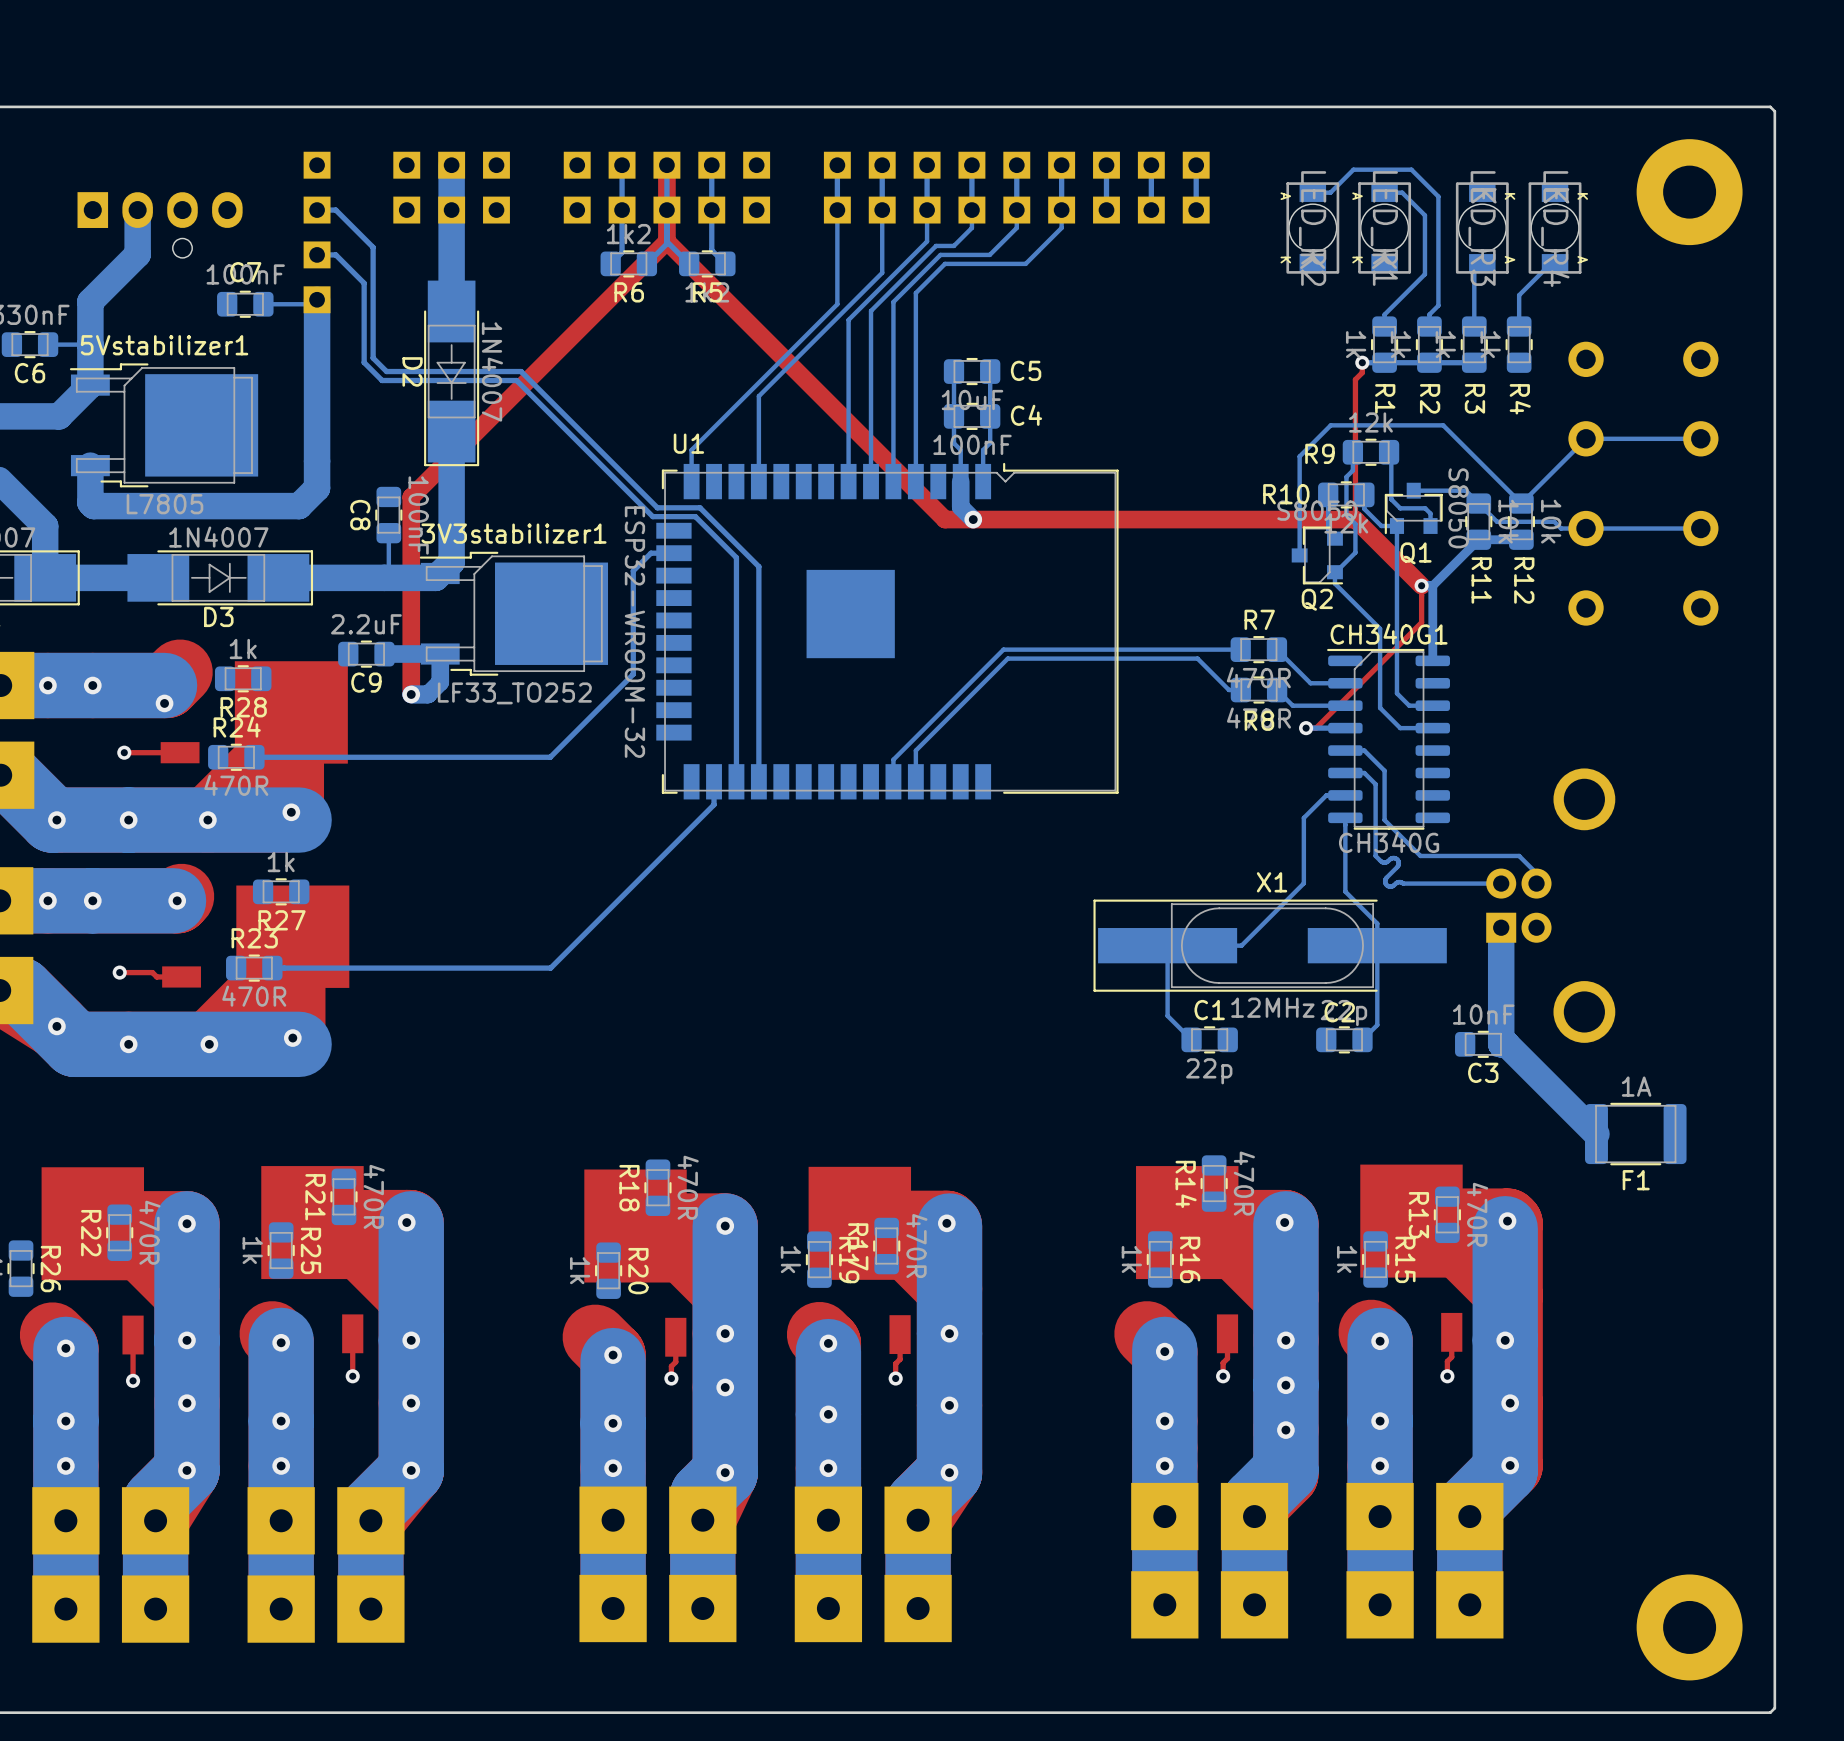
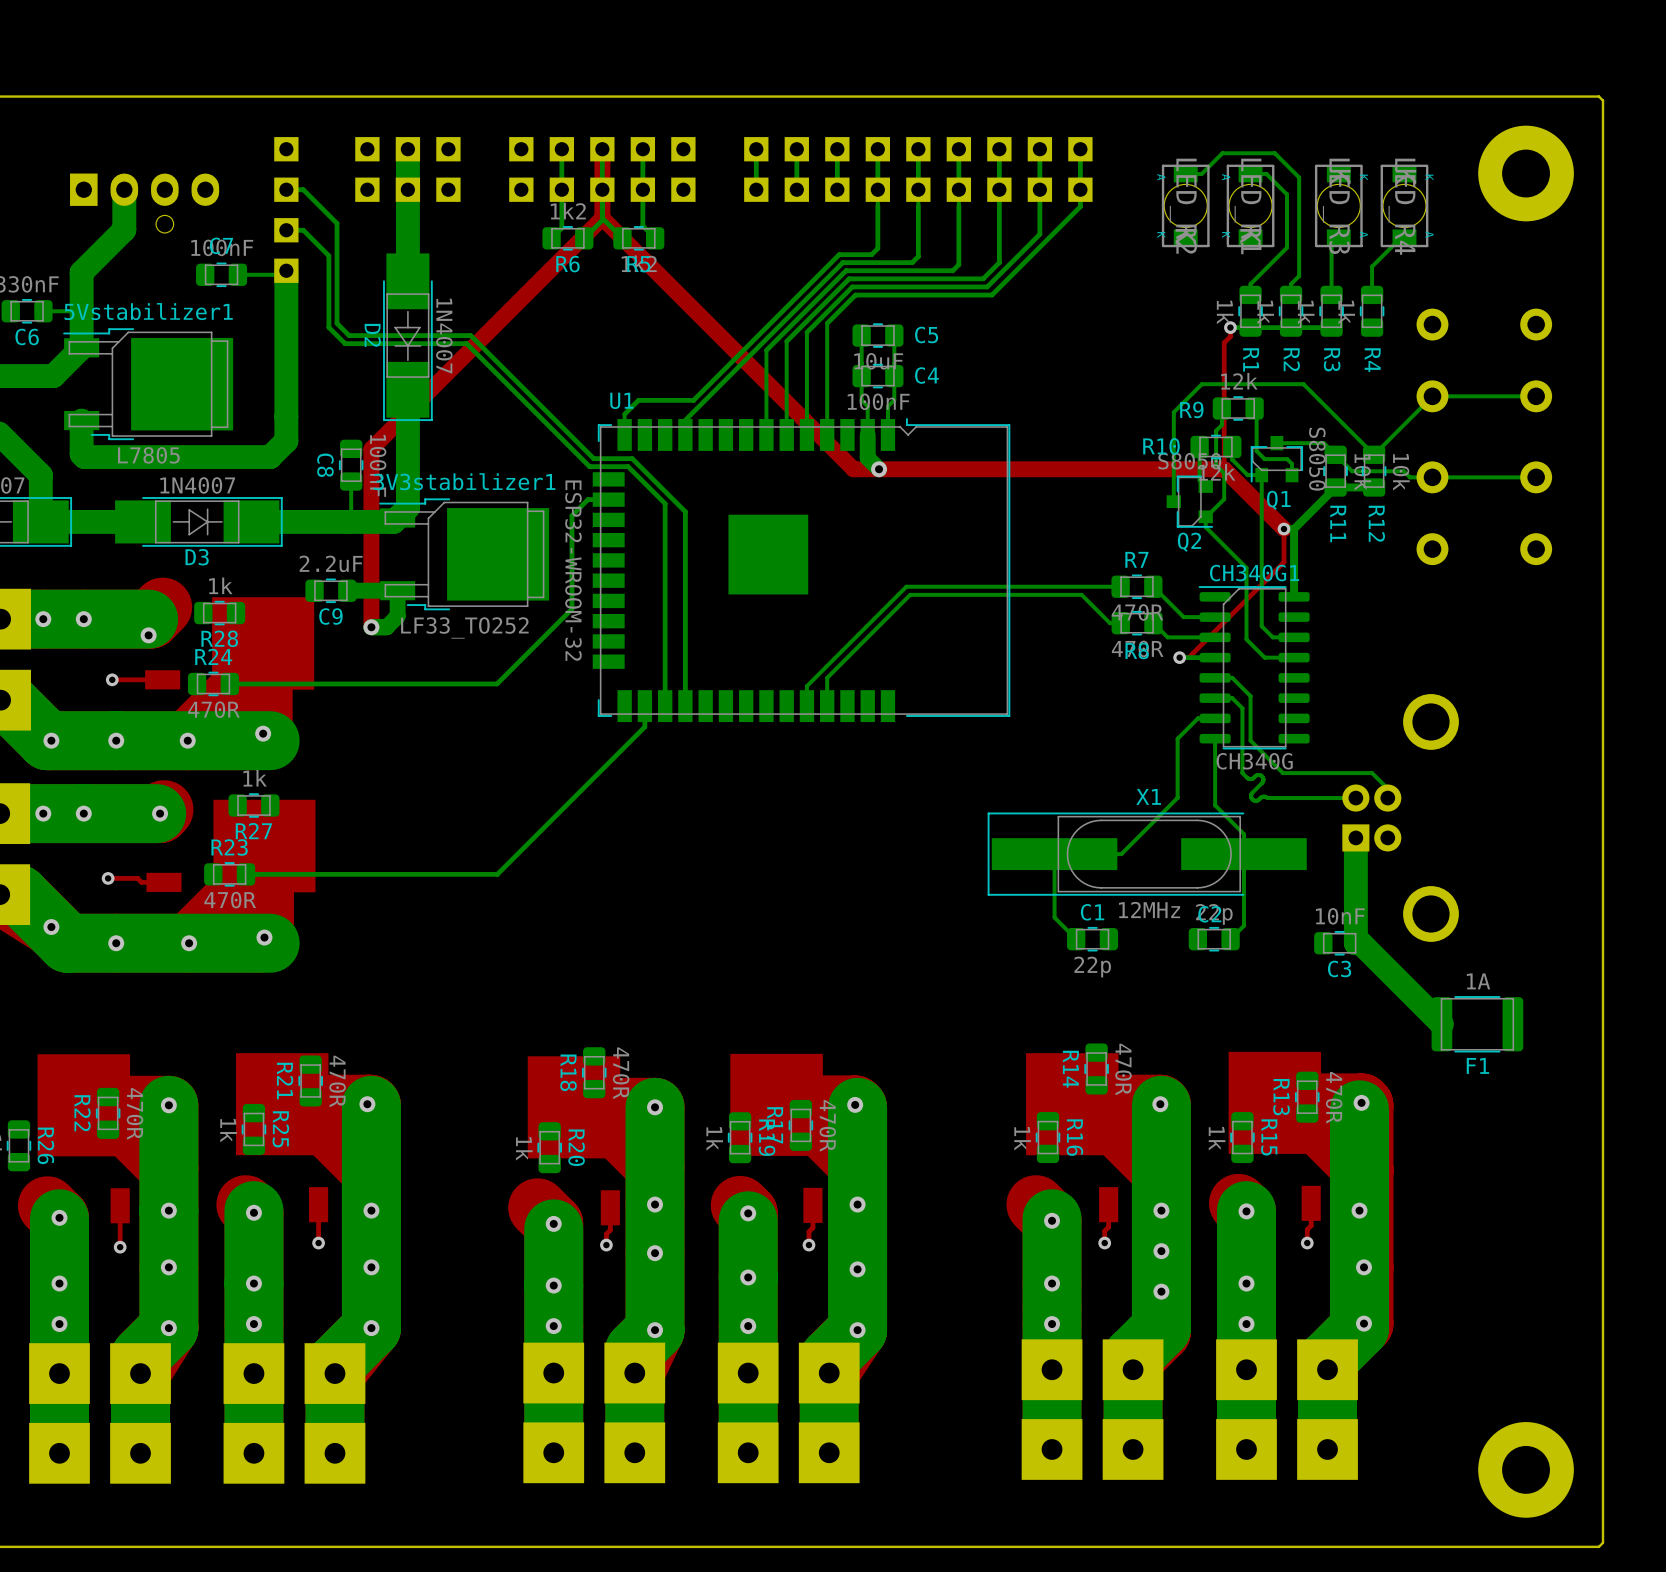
bottom track: (837, 210) (837, 304) (691, 450) (691, 458) -> (877, 205) (877, 248) (871, 254) (839, 254) (693, 400) (638, 400) (624, 414)
bottom track: (882, 210) (882, 272) (758, 396) (758, 465) -> (918, 205) (918, 256) (912, 262) (842, 262) (685, 420)
bottom track: (927, 210) (927, 241) (848, 319) (848, 387) -> none
bottom track: none -> (1080, 189) (1080, 206) (992, 295) (855, 295) (827, 323)
bottom track: (971, 227) (953, 245) (936, 245) (871, 310) (871, 377) -> (999, 189) (999, 262) (983, 278) (849, 278) (786, 341)
bottom track: (1016, 227) (989, 254) (940, 254) (893, 302) (893, 368) -> (1039, 189) (1039, 234) (987, 286) (852, 286) (806, 332)
bottom track: (1061, 227) (1025, 263) (945, 263) (915, 293) (915, 358) -> (958, 205) (958, 264) (952, 270) (846, 270) (766, 350)

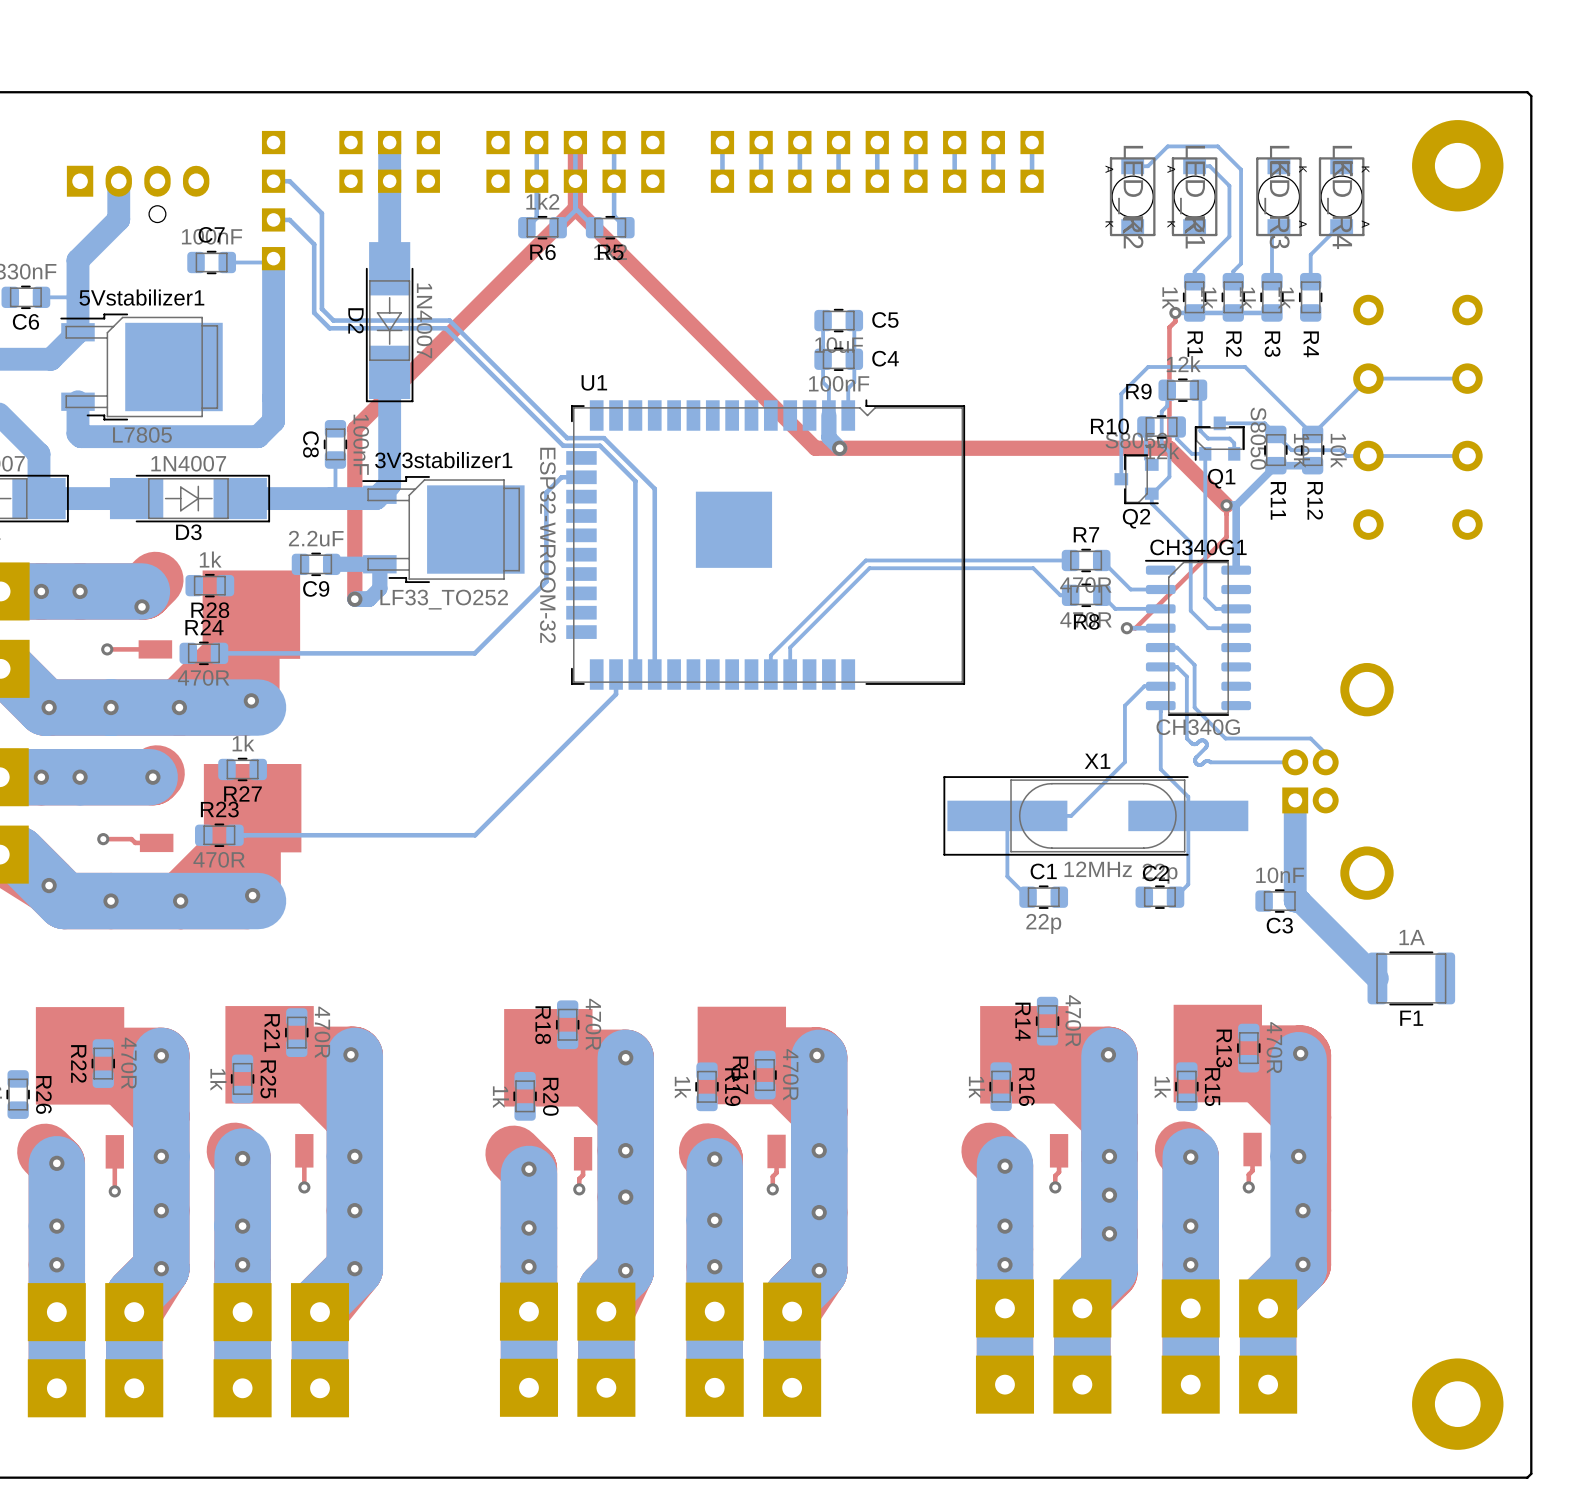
bottom track: (877, 189) (877, 248) (871, 254) (839, 254) (693, 400) (638, 400) (624, 414) (624, 434) -> none
bottom track: (918, 189) (918, 256) (912, 262) (842, 262) (685, 420) (685, 434) -> none
bottom track: (958, 189) (958, 264) (952, 270) (846, 270) (766, 350) (766, 434) -> none
bottom track: (999, 189) (999, 262) (983, 278) (849, 278) (786, 341) (786, 434) -> none
bottom track: (1039, 189) (1039, 234) (987, 286) (852, 286) (806, 332) (806, 434) -> none
bottom track: (1080, 189) (1080, 206) (992, 295) (855, 295) (827, 323) (827, 434) -> none

